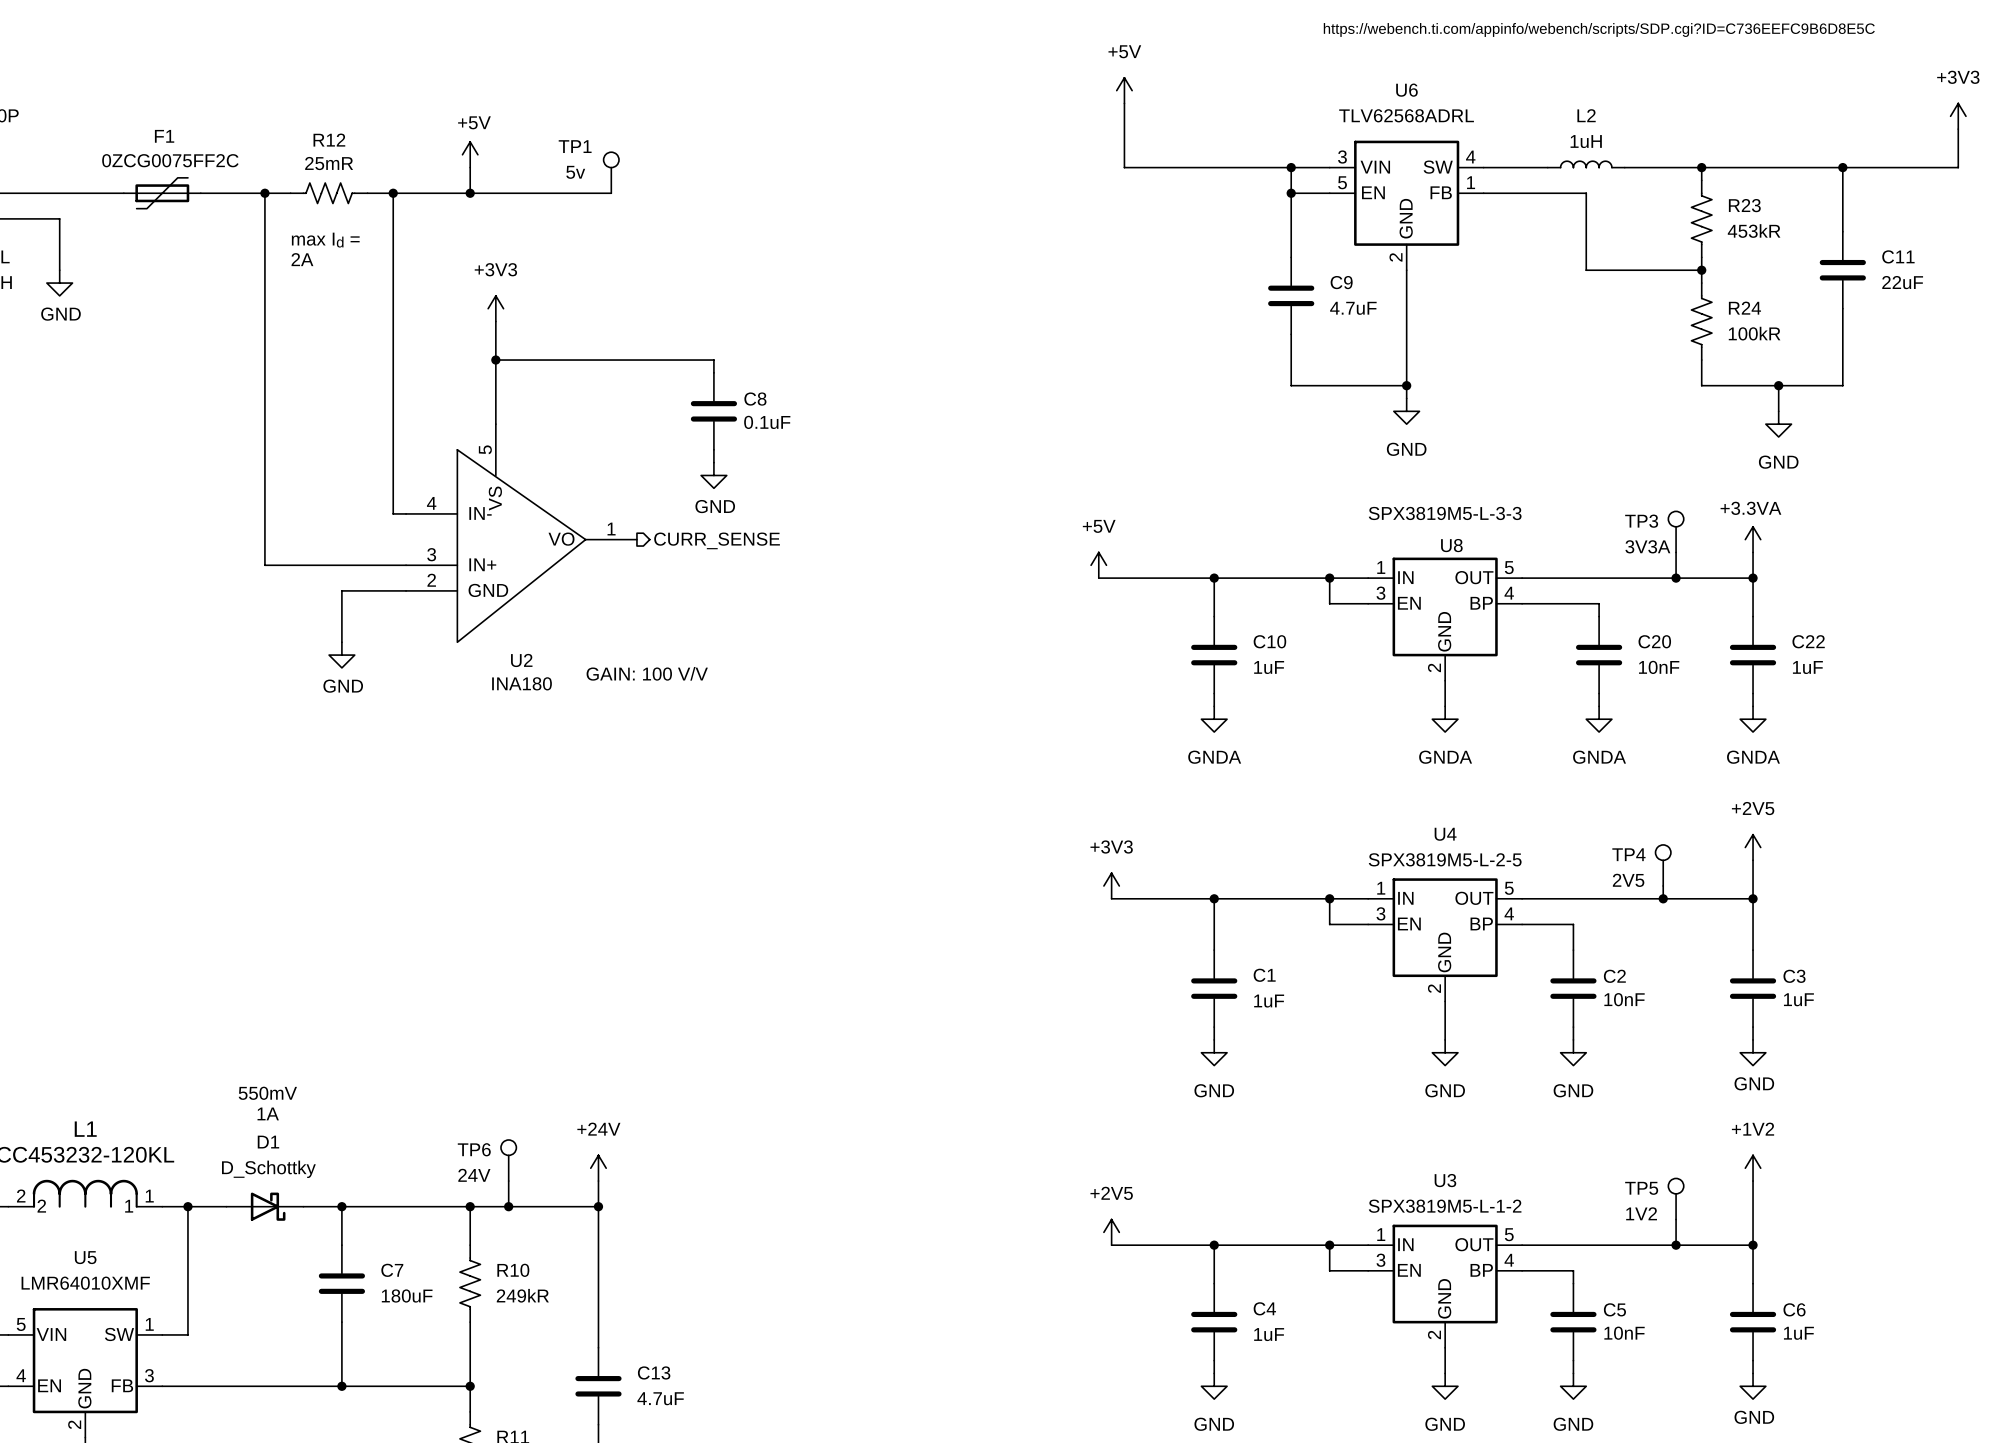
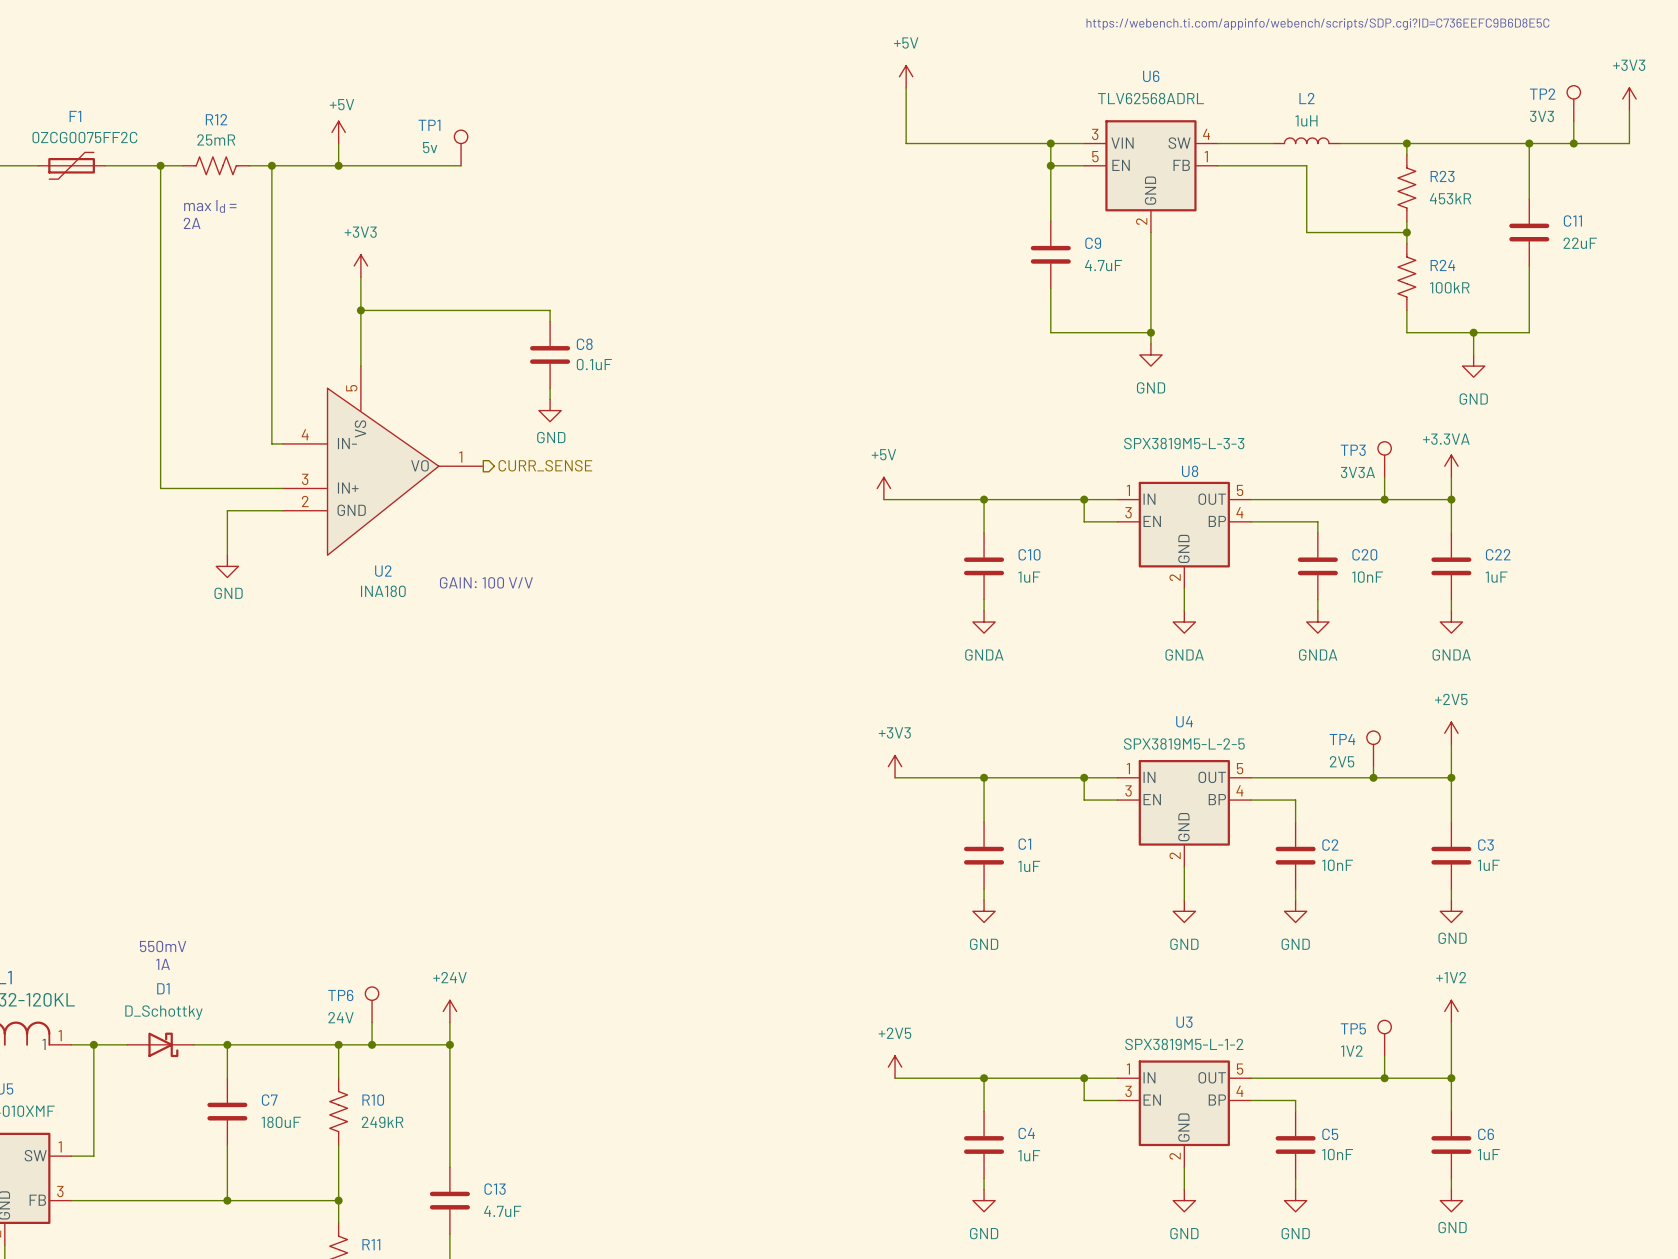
TP2: none -> 3V3 (1573, 103)
wire: none -> (1573, 121) (1573, 143)
junction: none -> (1573, 143)

